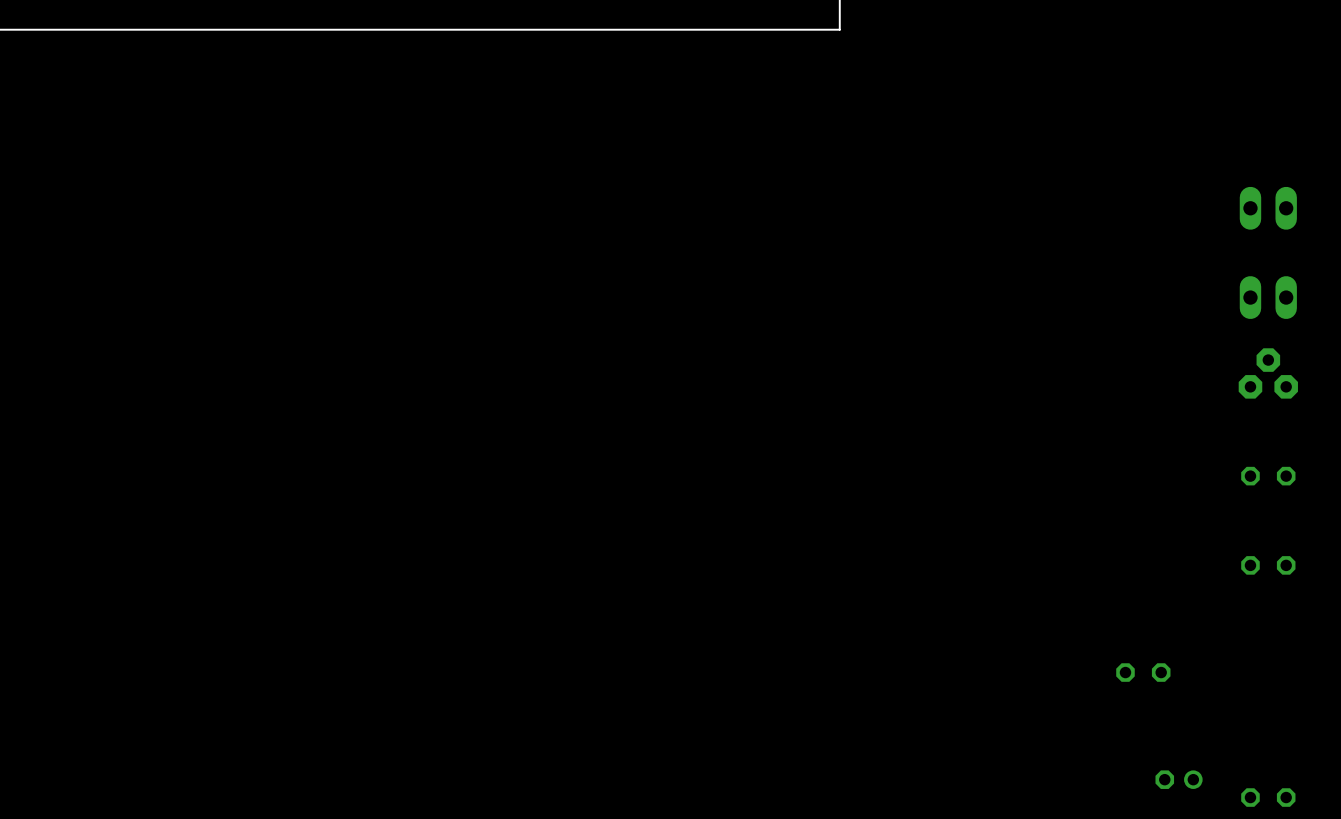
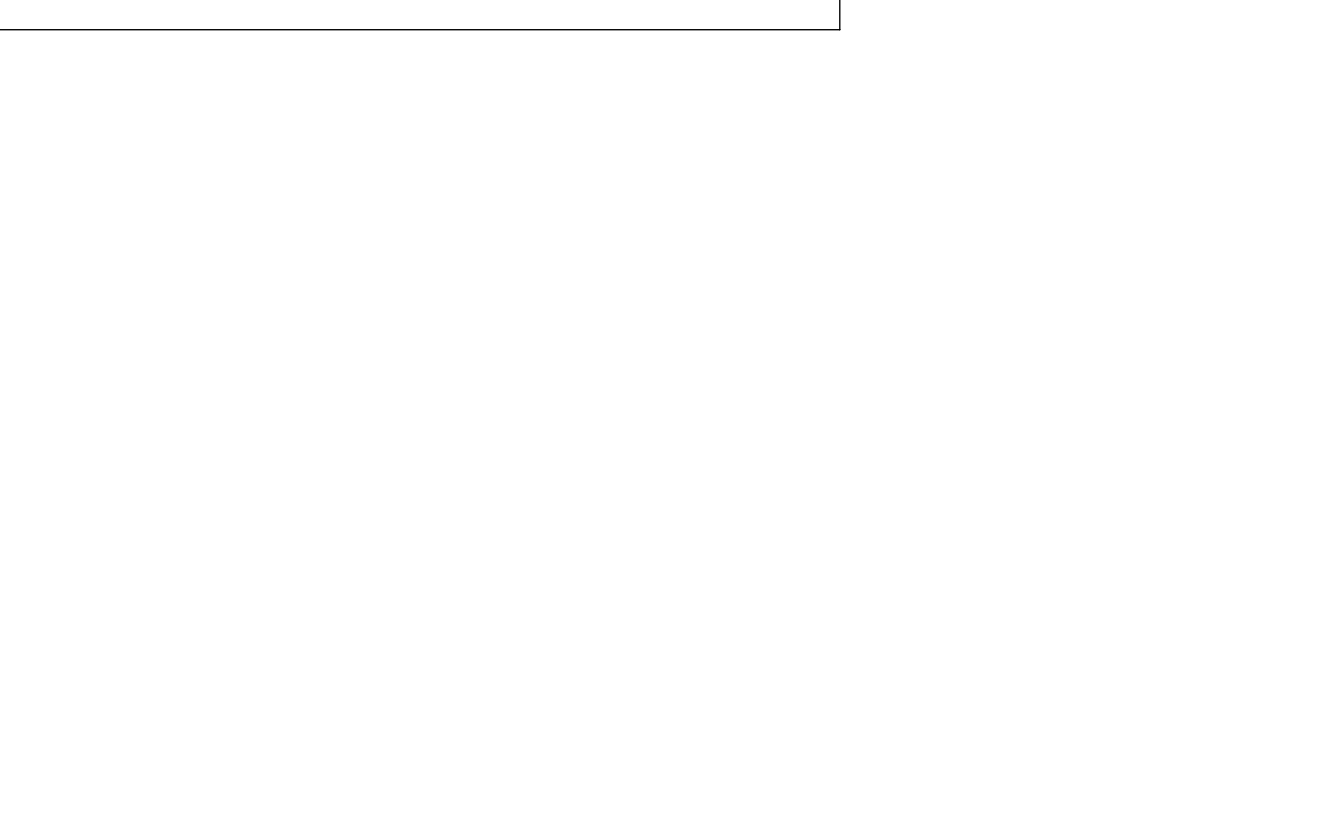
part: (1268, 208) -> none
part: (1268, 297) -> none
part: (1268, 373) -> none
part: (1268, 476) -> none
part: (1268, 565) -> none
part: (1143, 672) -> none
part: (1179, 779) -> none
part: (1268, 797) -> none

